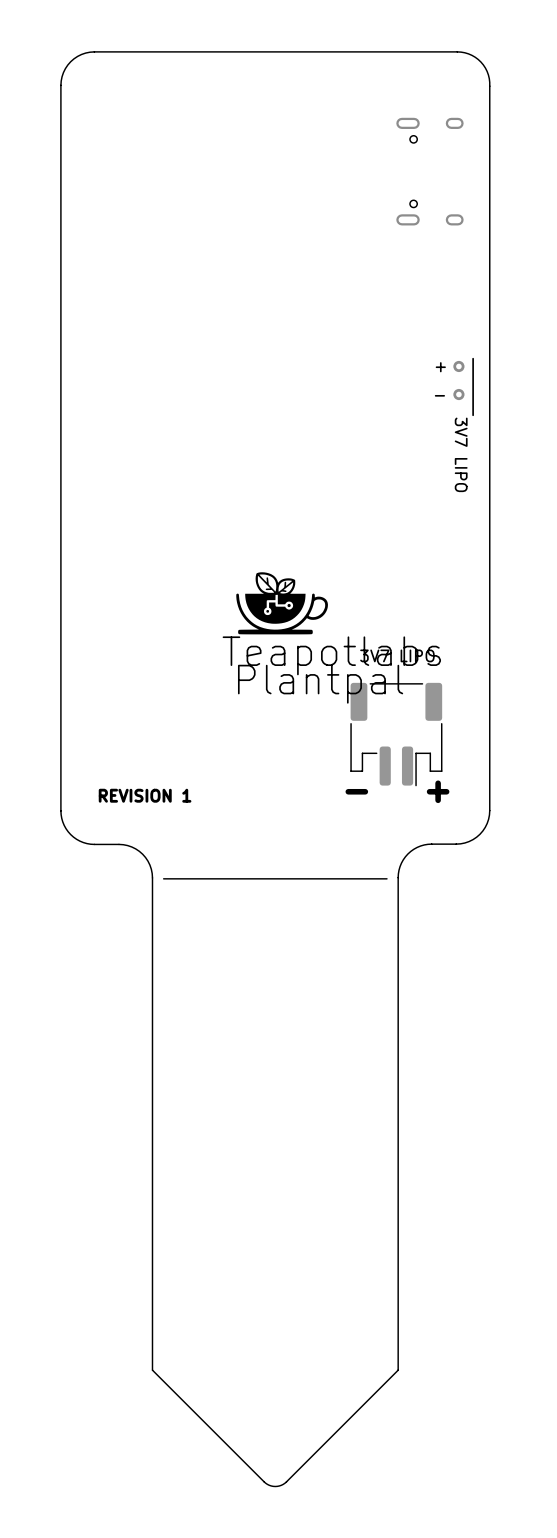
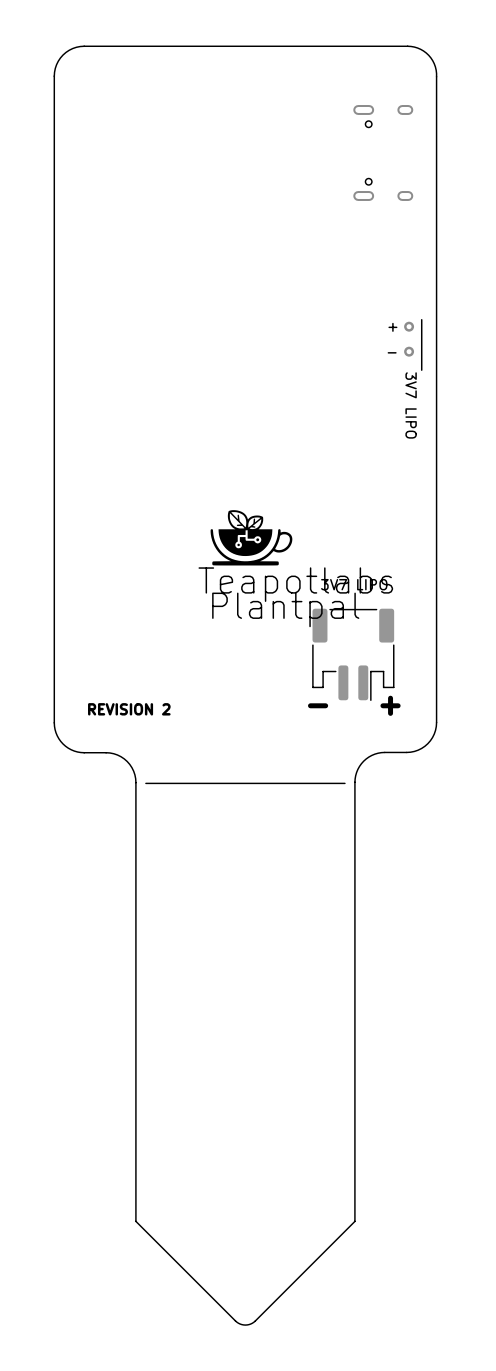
text: REVISION 1 (145, 795) -> REVISION 2 (129, 709)

